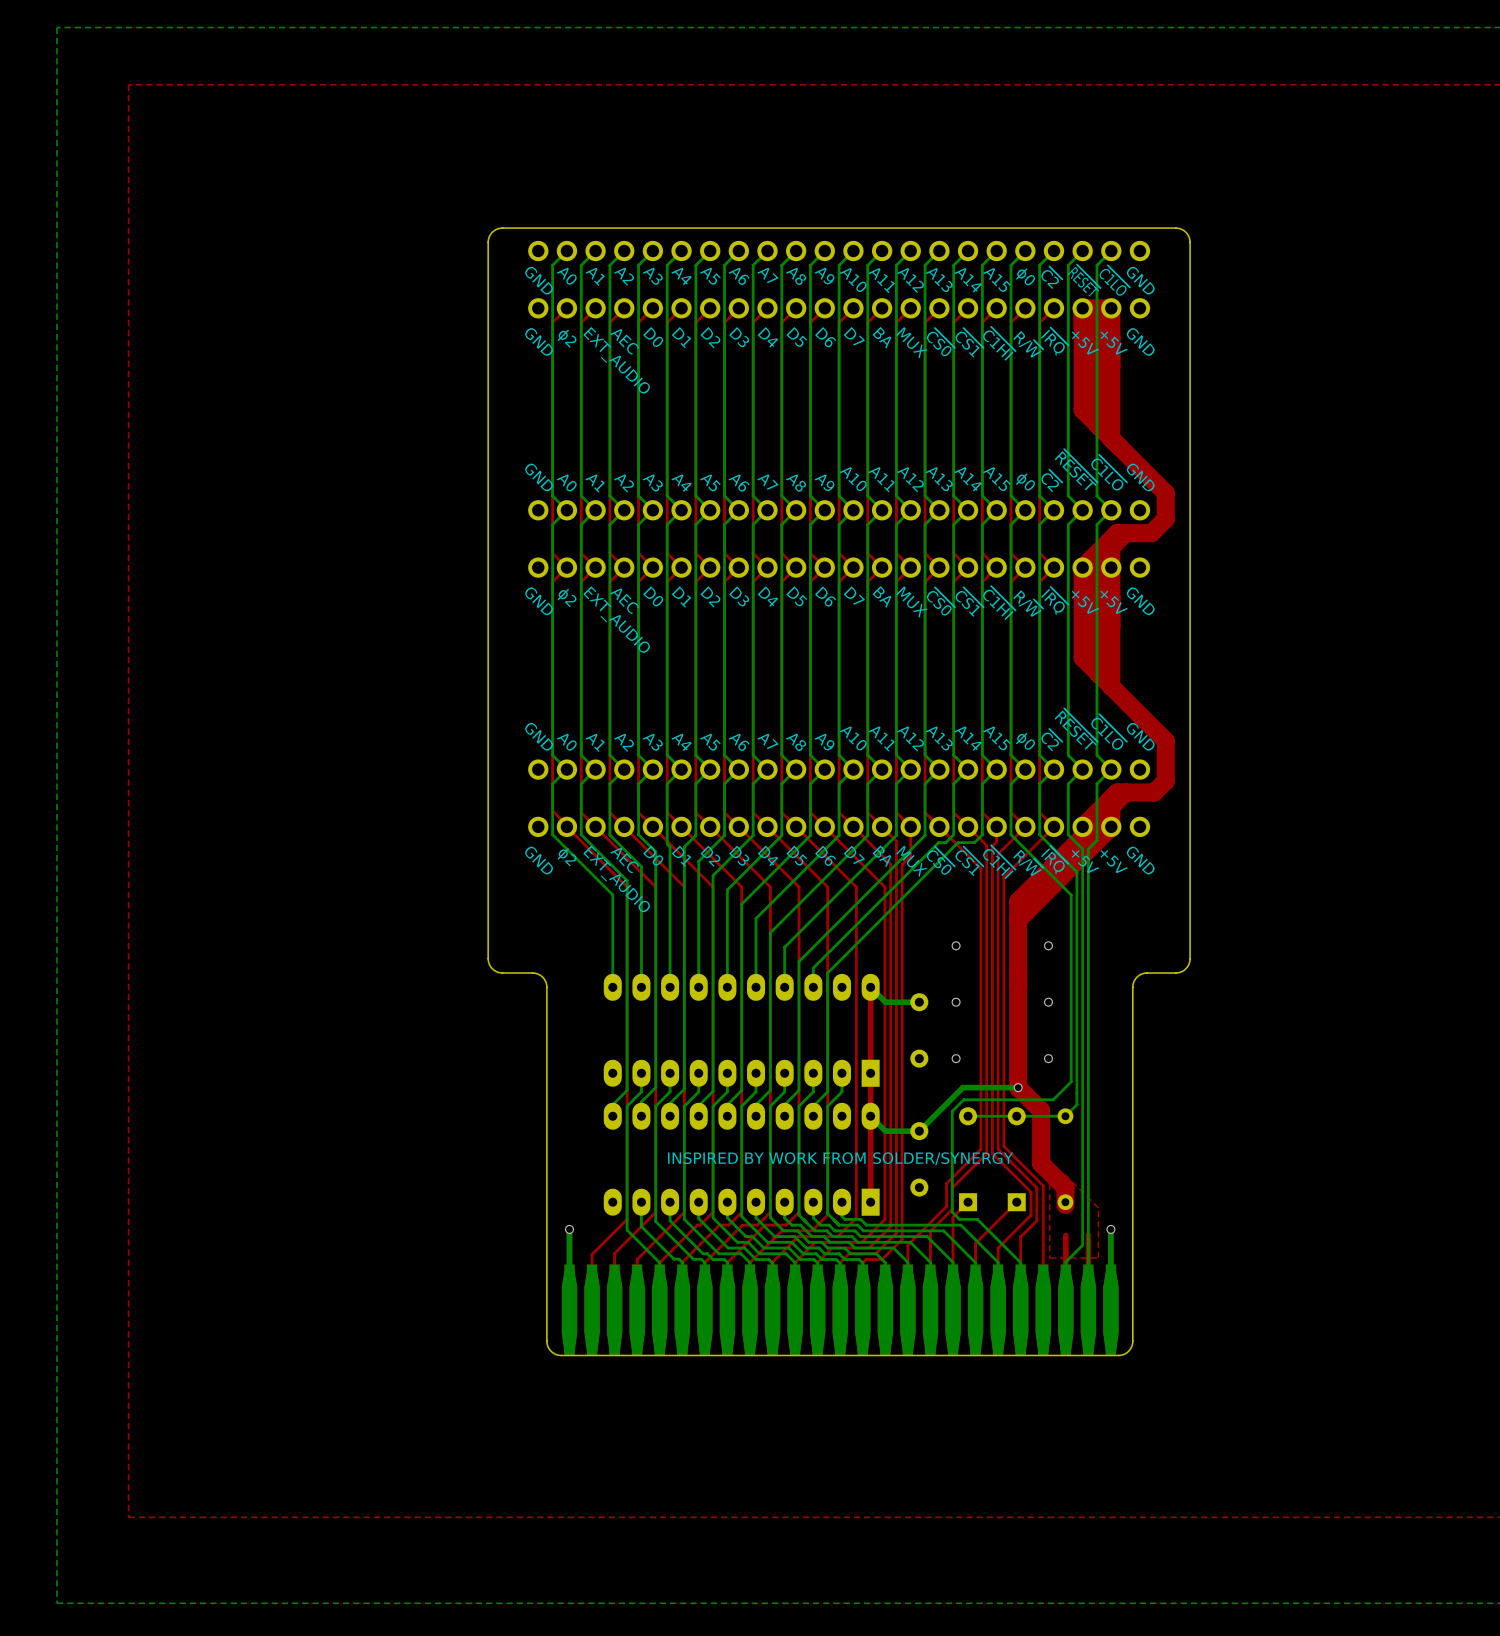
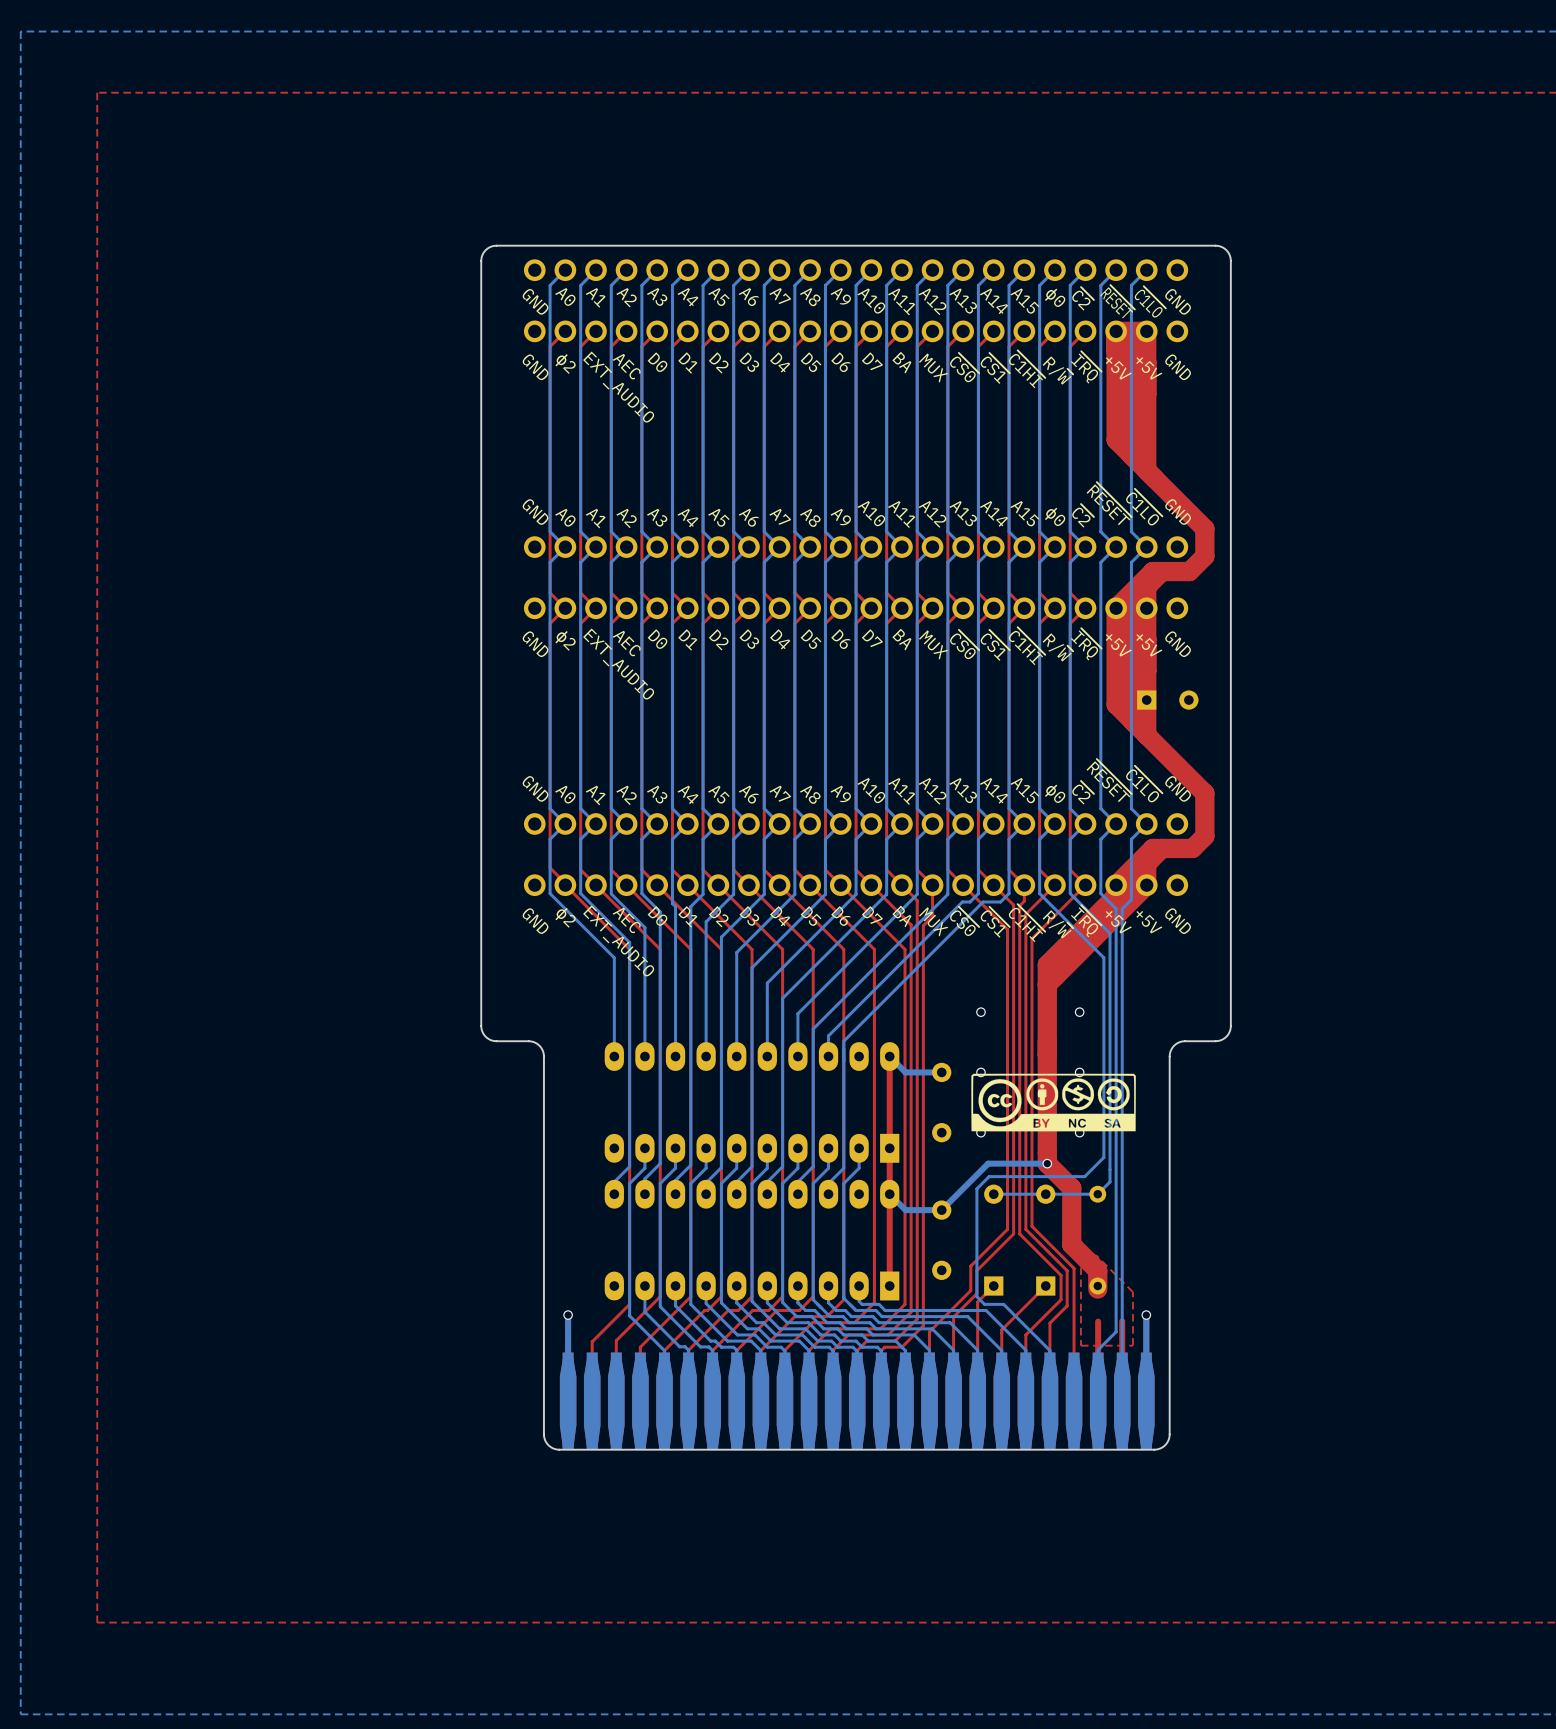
part: none -> (1167, 700)
drawing: none -> [971, 1073, 1136, 1132]
text: INSPIRED BY WORK FROM SOLDER/SYNERGY (840, 1158) -> none

